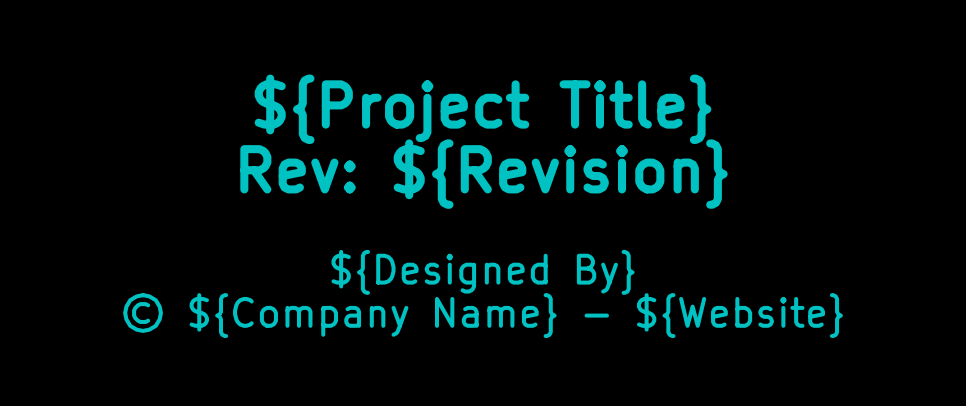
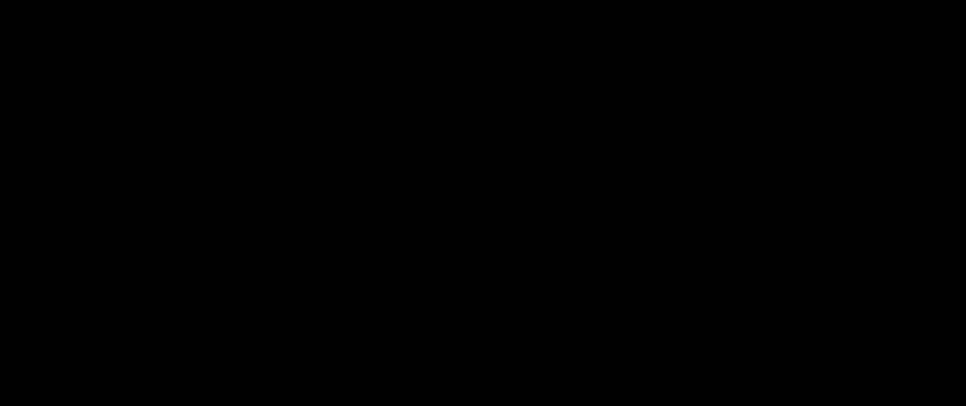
text: ${Project Title} (483, 109) -> none
text: Rev: ${Revision} (483, 174) -> none
text: ${Designed By} (483, 272) -> none
text: © ${Company Name} - ${Website} (483, 315) -> none

